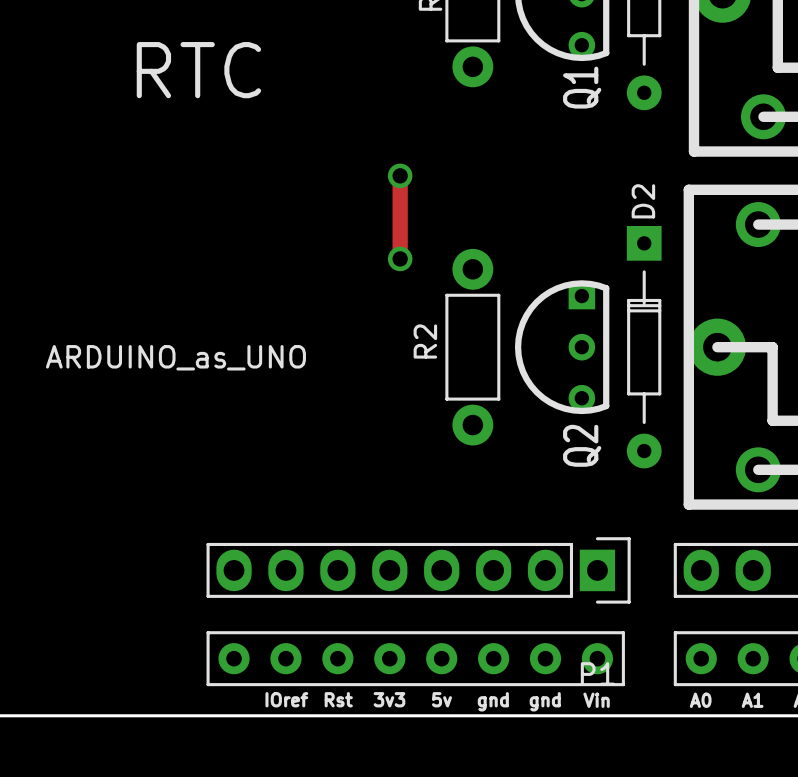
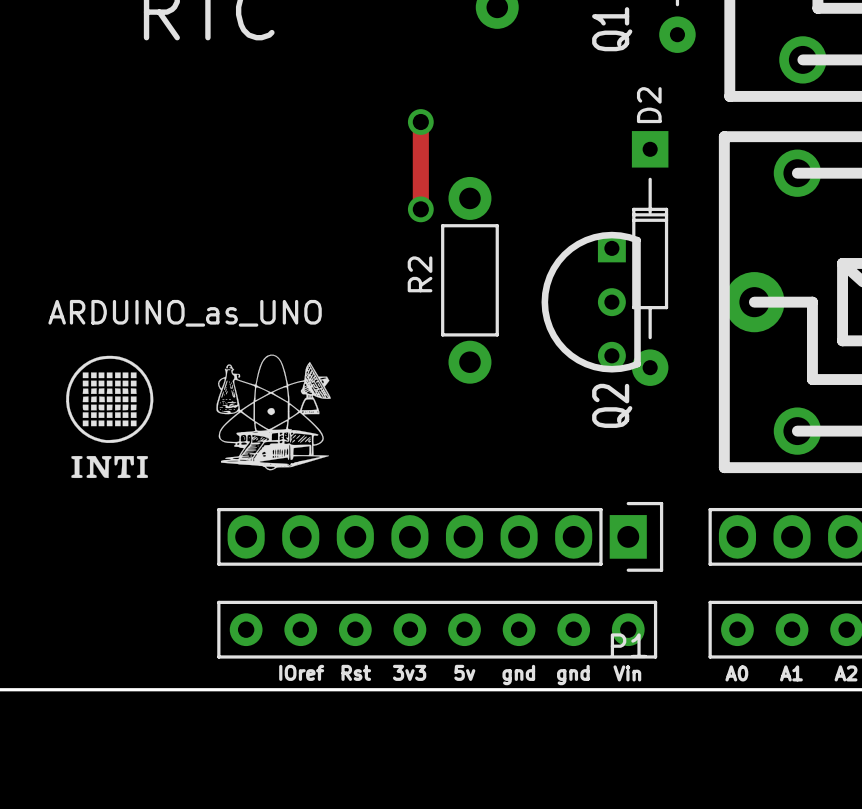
R2 position: (472, 347) -> (469, 280)
D2 position: (644, 347) -> (650, 258)
drawing: none -> [216, 354, 331, 471]
drawing: none -> [66, 355, 154, 479]

